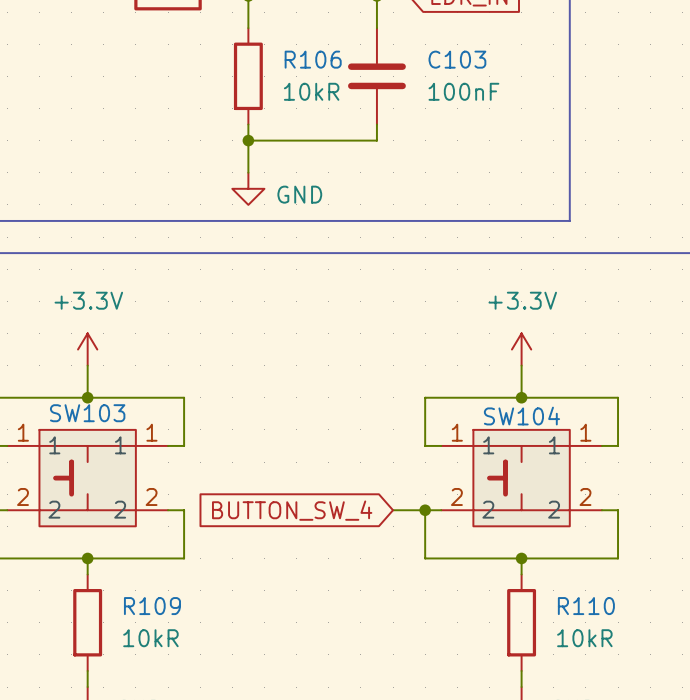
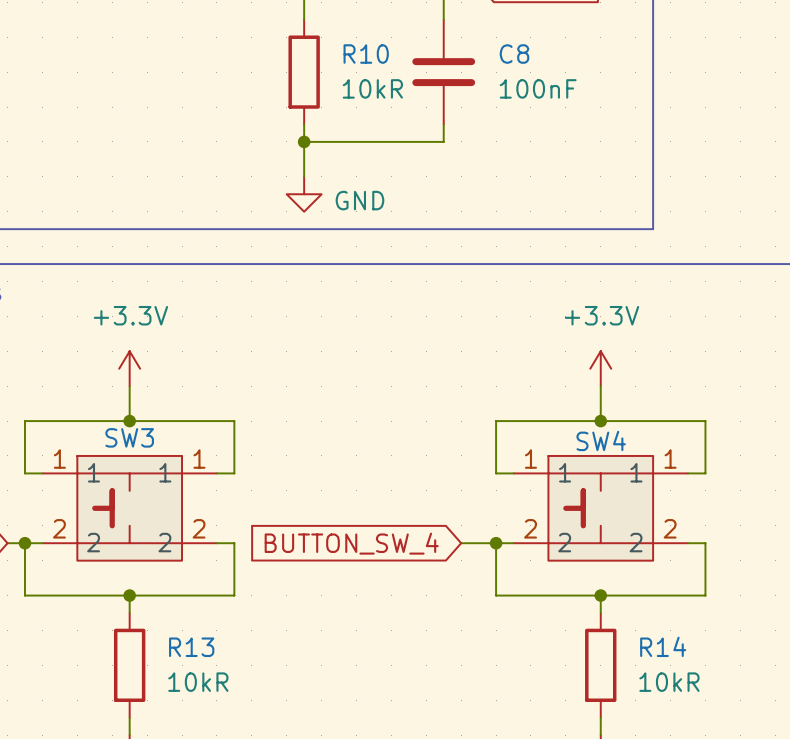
R106 name: R106 (313, 59) -> R10 (366, 54)
C103 name: C103 (457, 59) -> C8 (514, 54)
SW103 name: SW103 (87, 413) -> SW3 (129, 437)
SW104 name: SW104 (521, 416) -> SW4 (601, 440)
R109 name: R109 (152, 606) -> R13 (191, 647)
R110 name: R110 (586, 606) -> R14 (663, 646)

